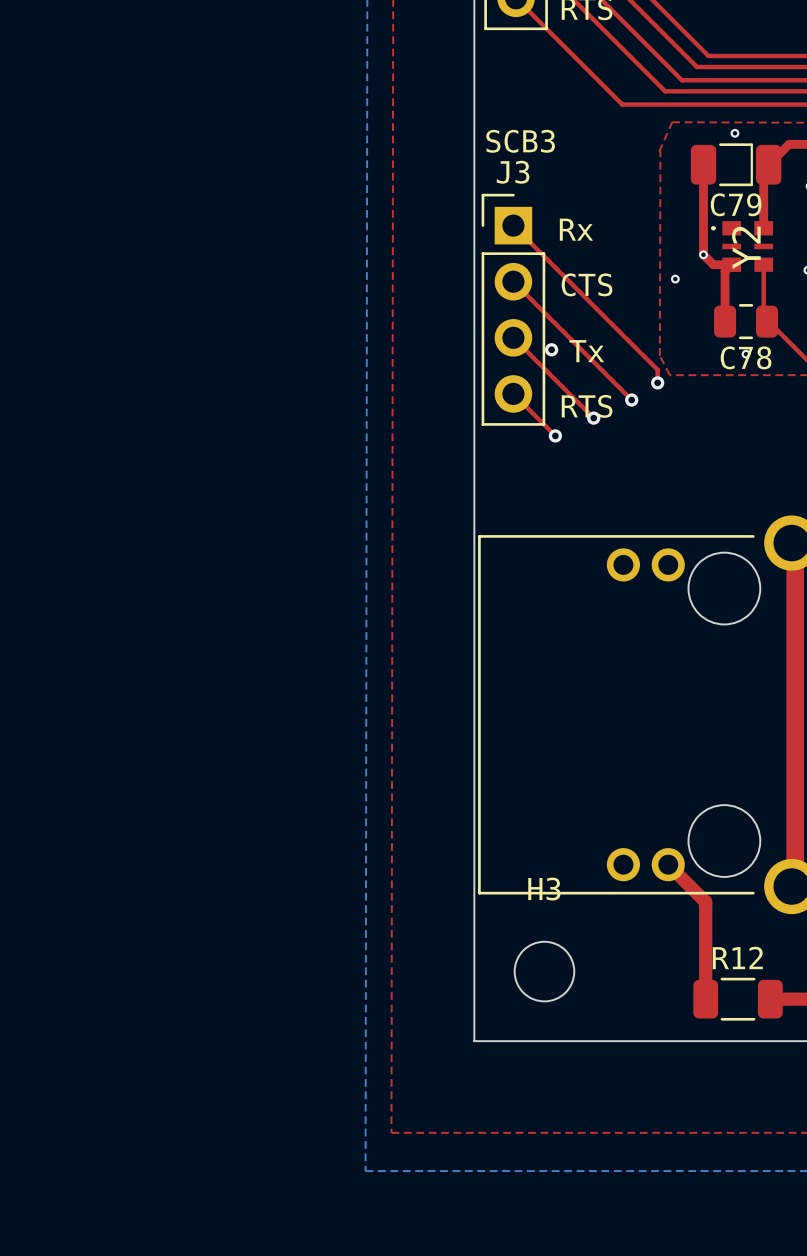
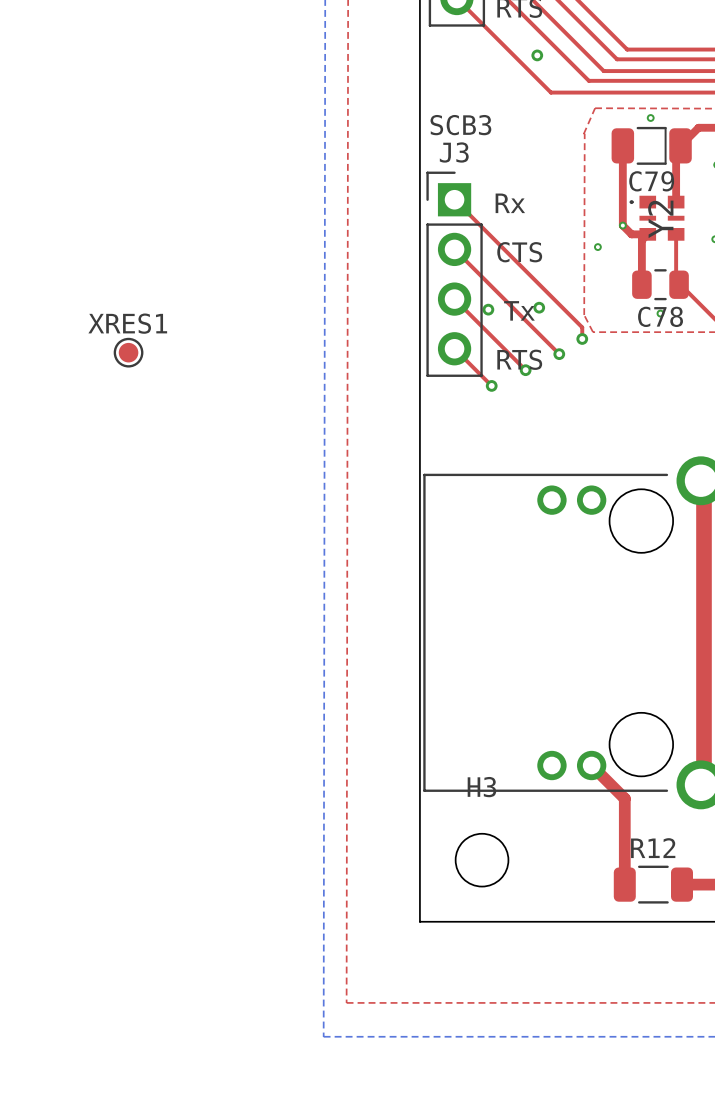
via: none -> (537, 55)
via: none -> (539, 307)
XRES1: none -> (128, 352)

